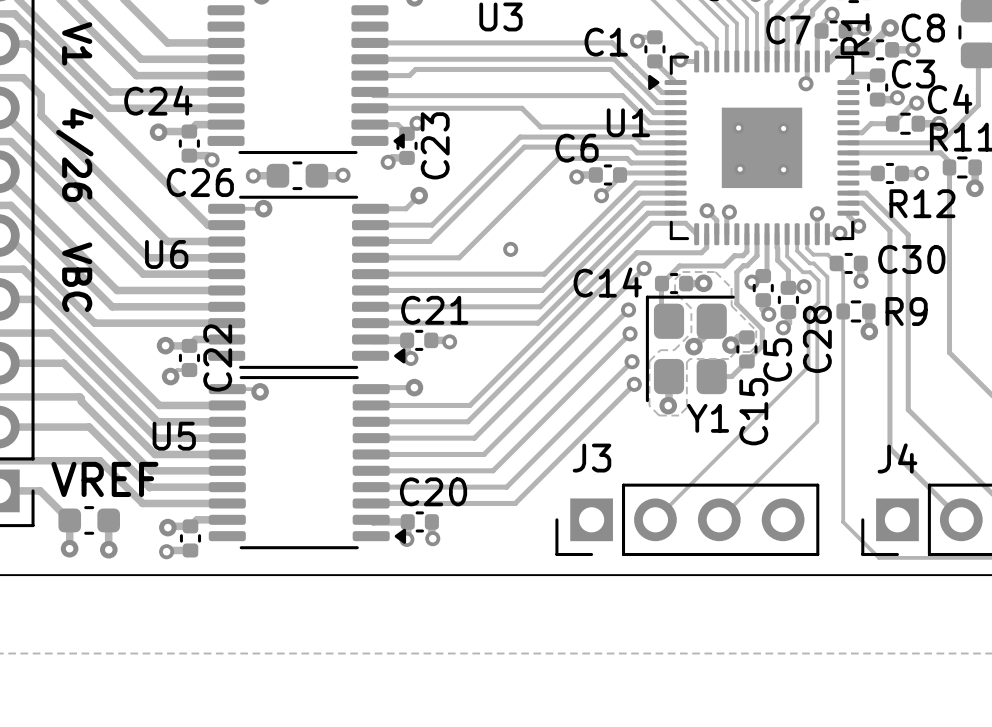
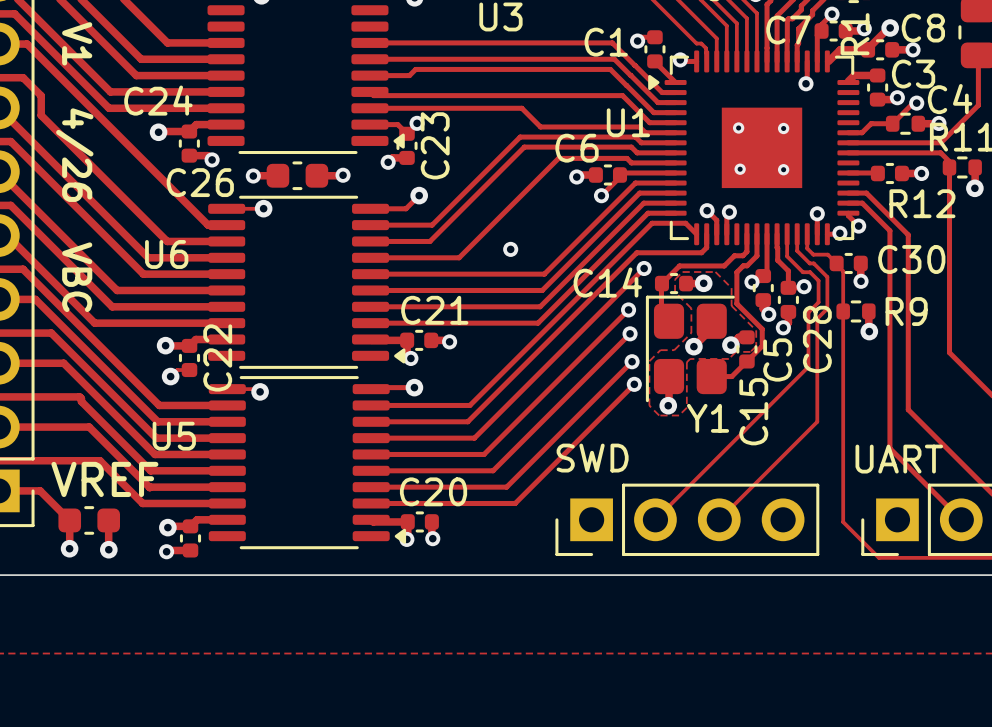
J3 name: J3 (592, 458) -> SWD (592, 458)
J4 name: J4 (897, 458) -> UART (899, 459)

